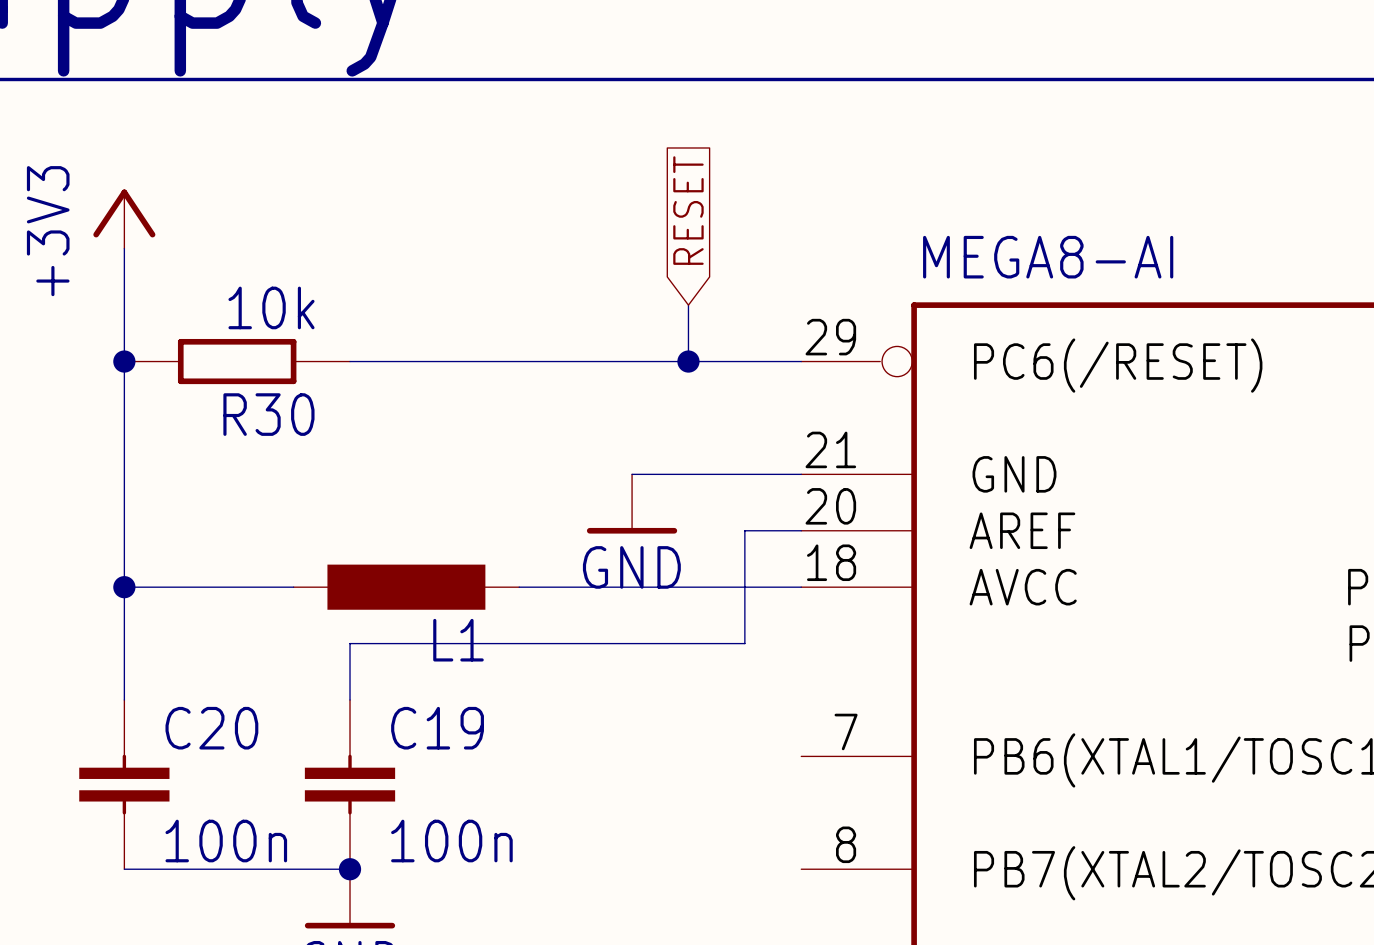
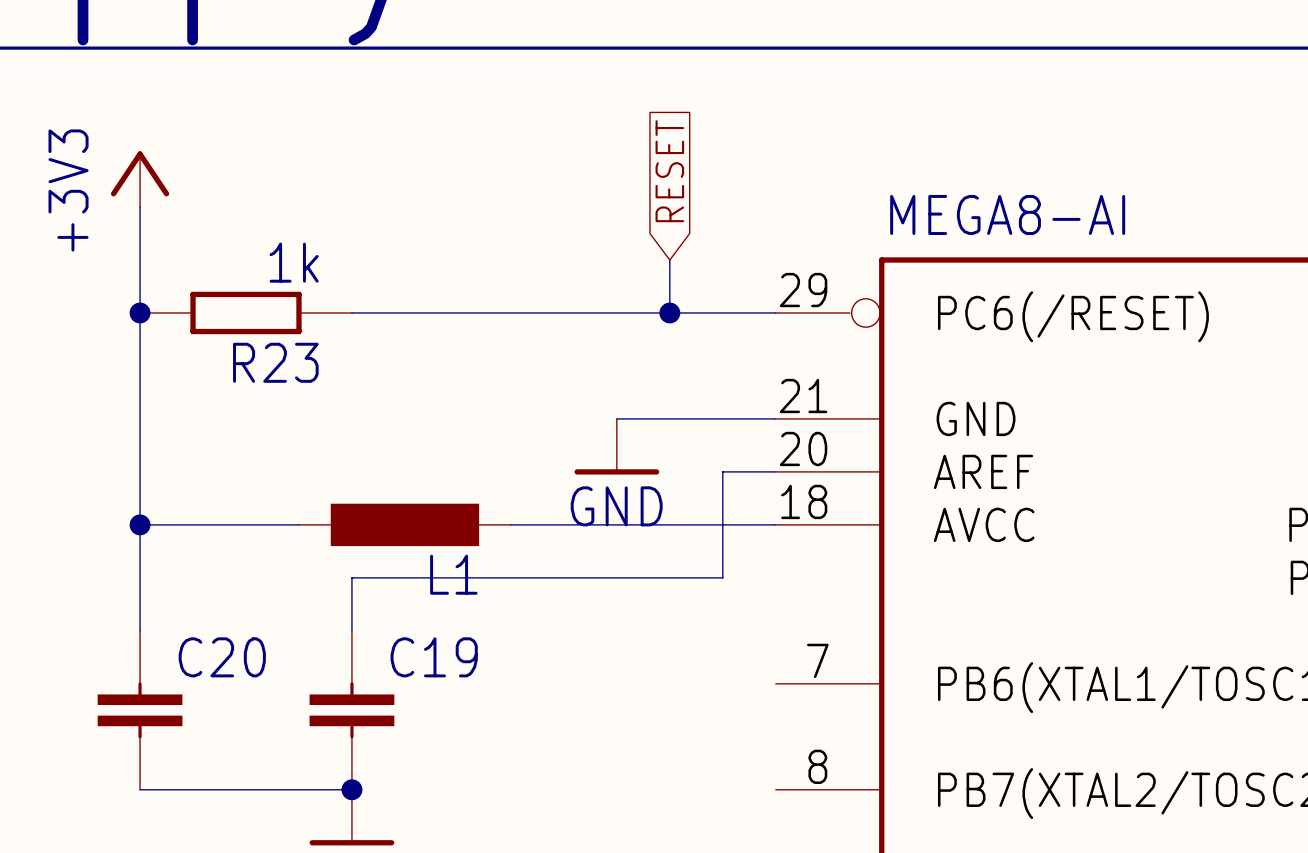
R30 value: 10k (271, 307) -> 1k (294, 262)
R30 name: R30 (268, 414) -> R23 (275, 362)
C20 value: 100n (226, 841) -> none
C19 value: 100n (451, 841) -> none

